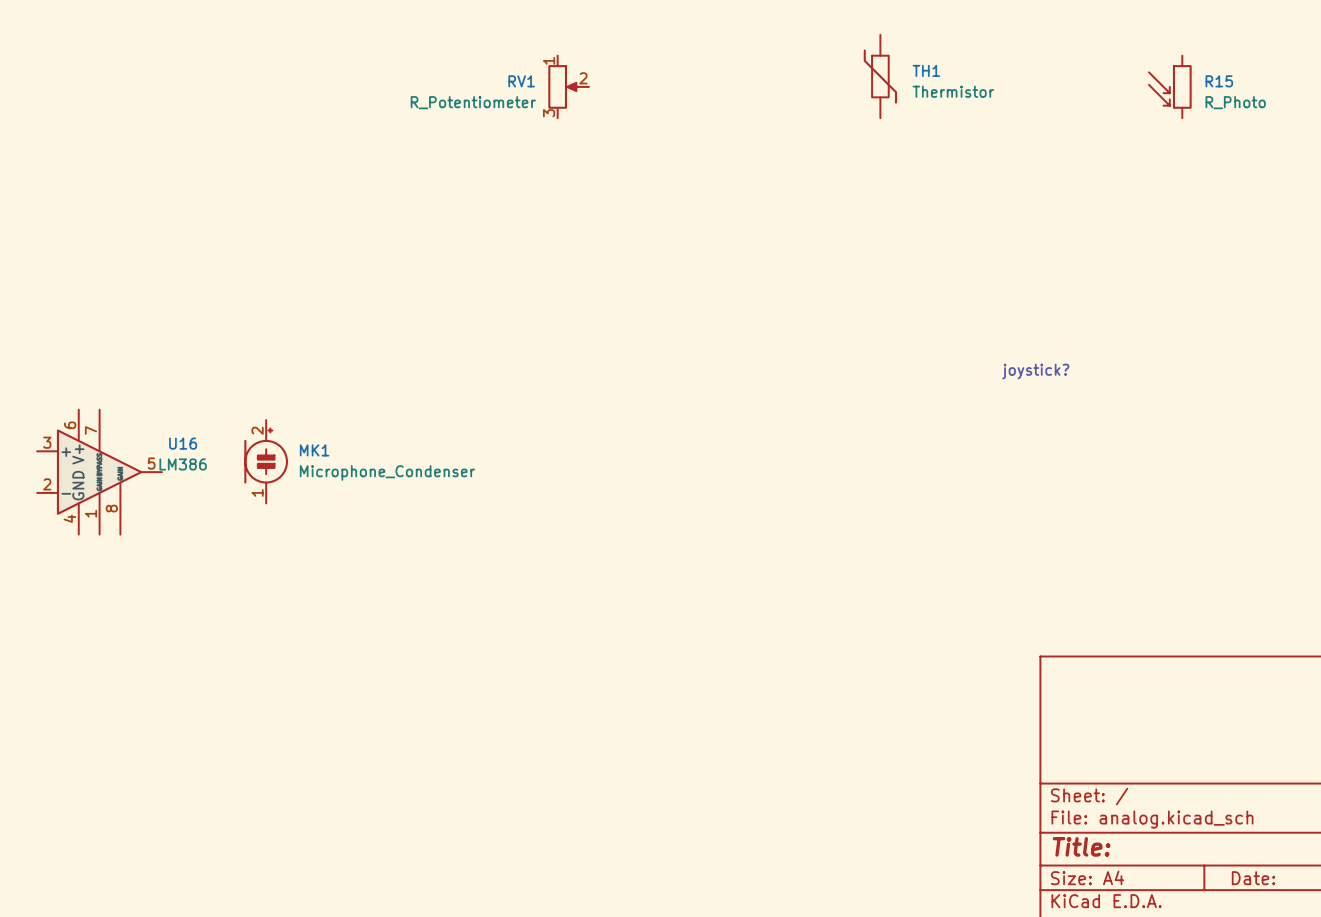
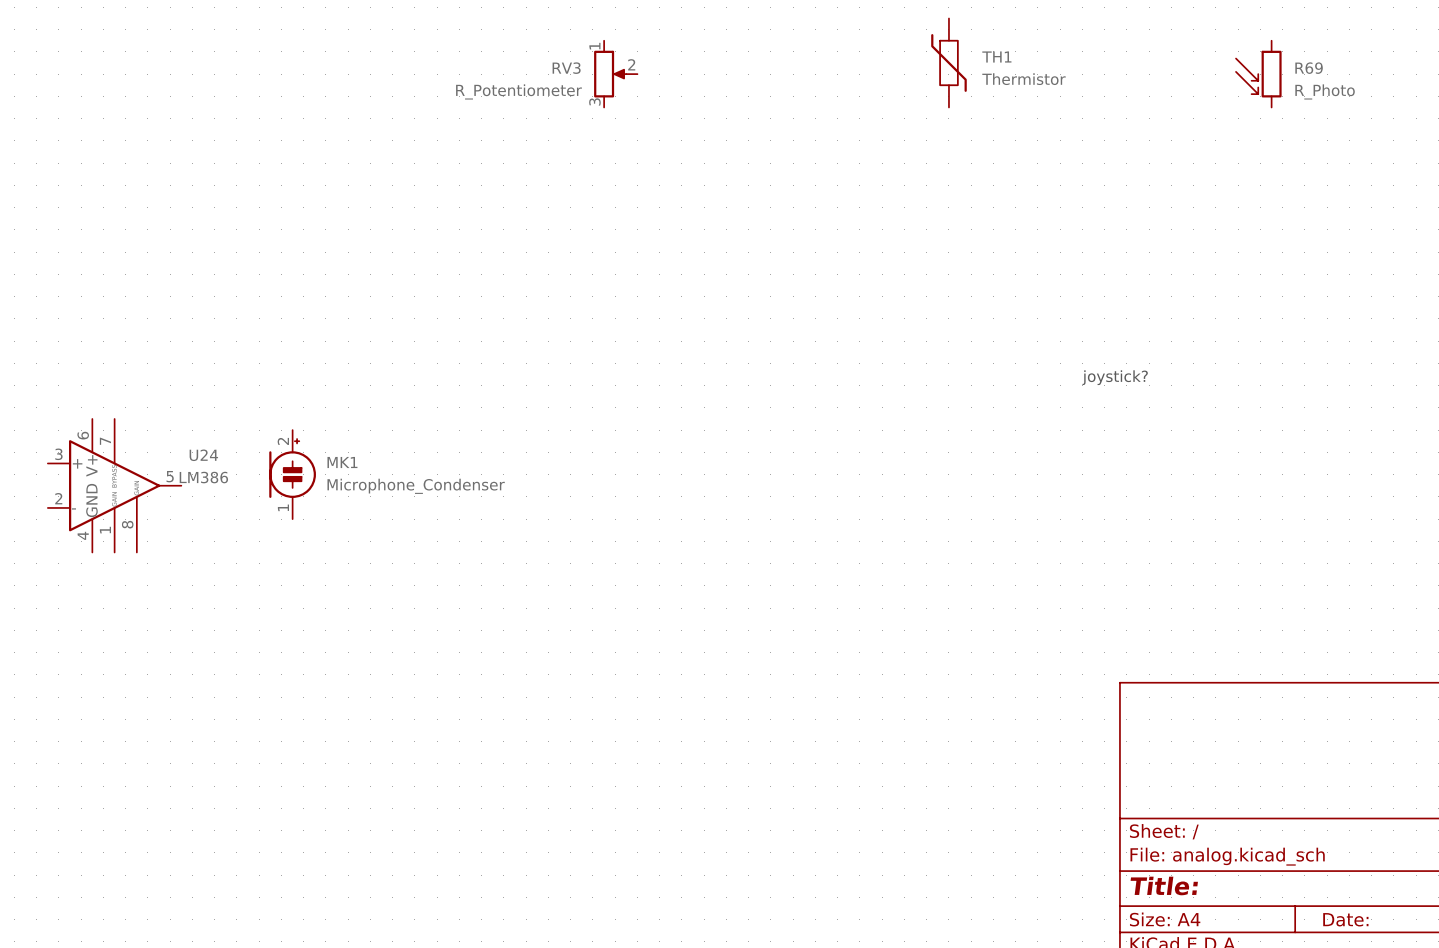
RV1 name: RV1 (521, 81) -> RV3 (566, 68)
R15 name: R15 (1219, 81) -> R69 (1309, 68)
U16 name: U16 (183, 443) -> U24 (203, 455)

